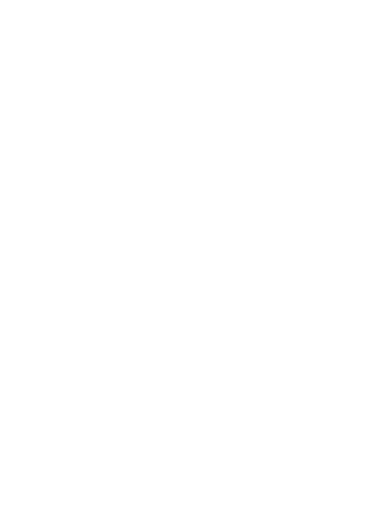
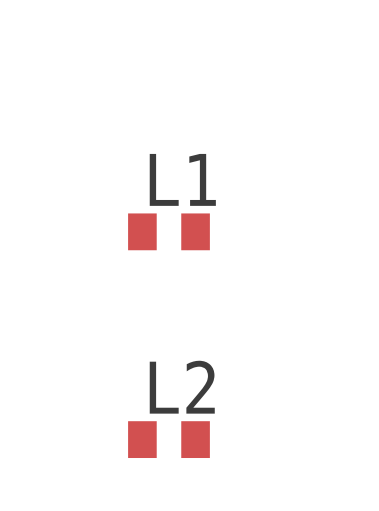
L1: none -> (168, 231)
L2: none -> (168, 439)

